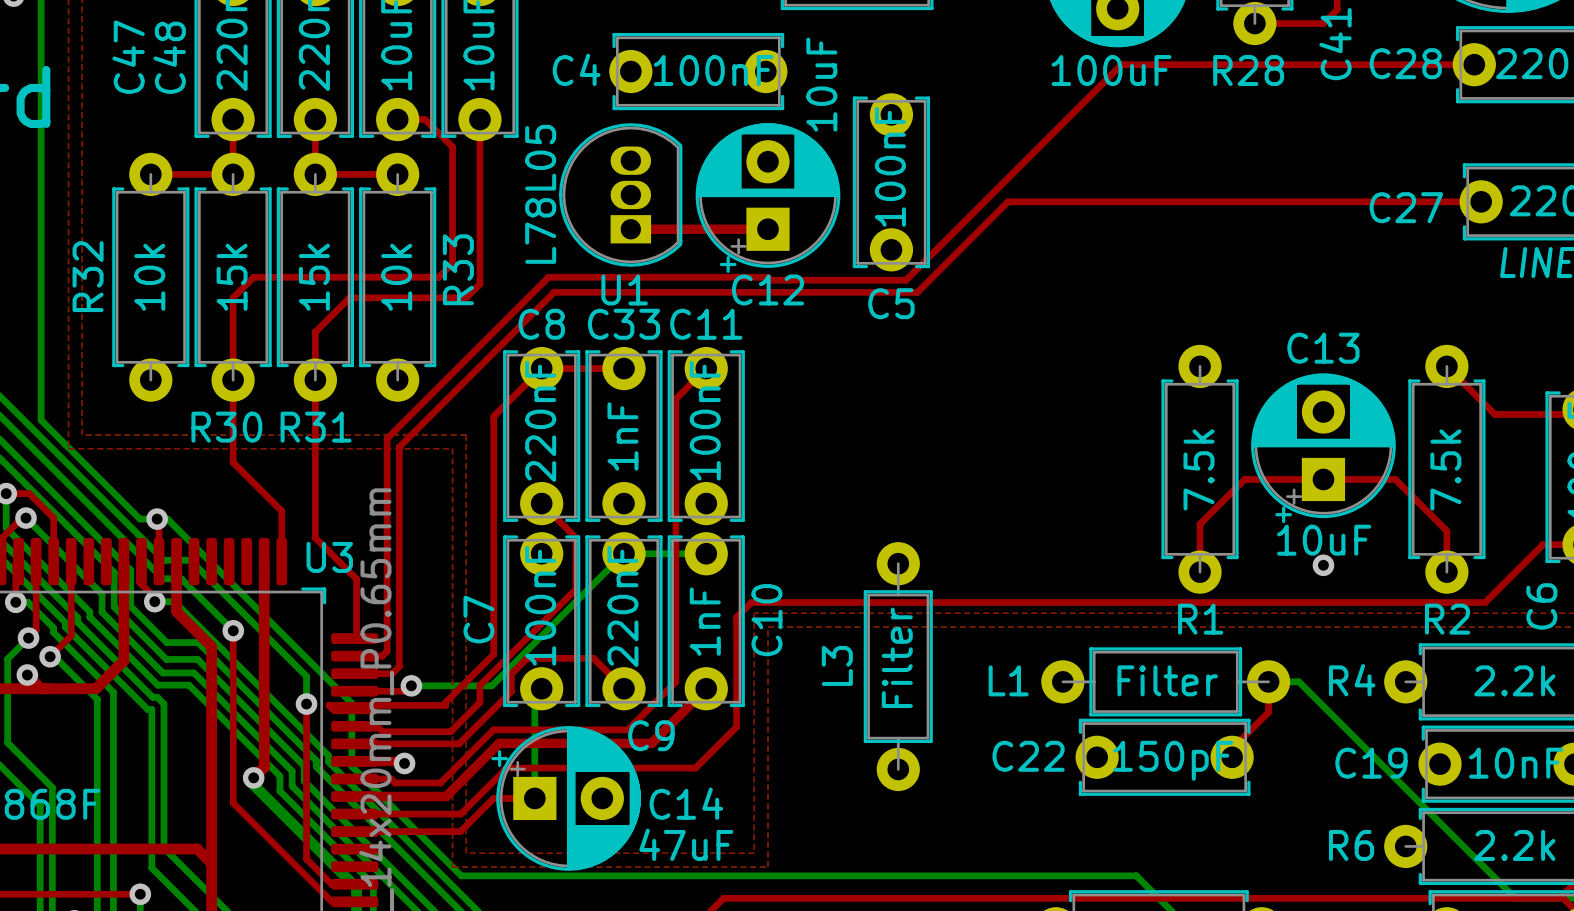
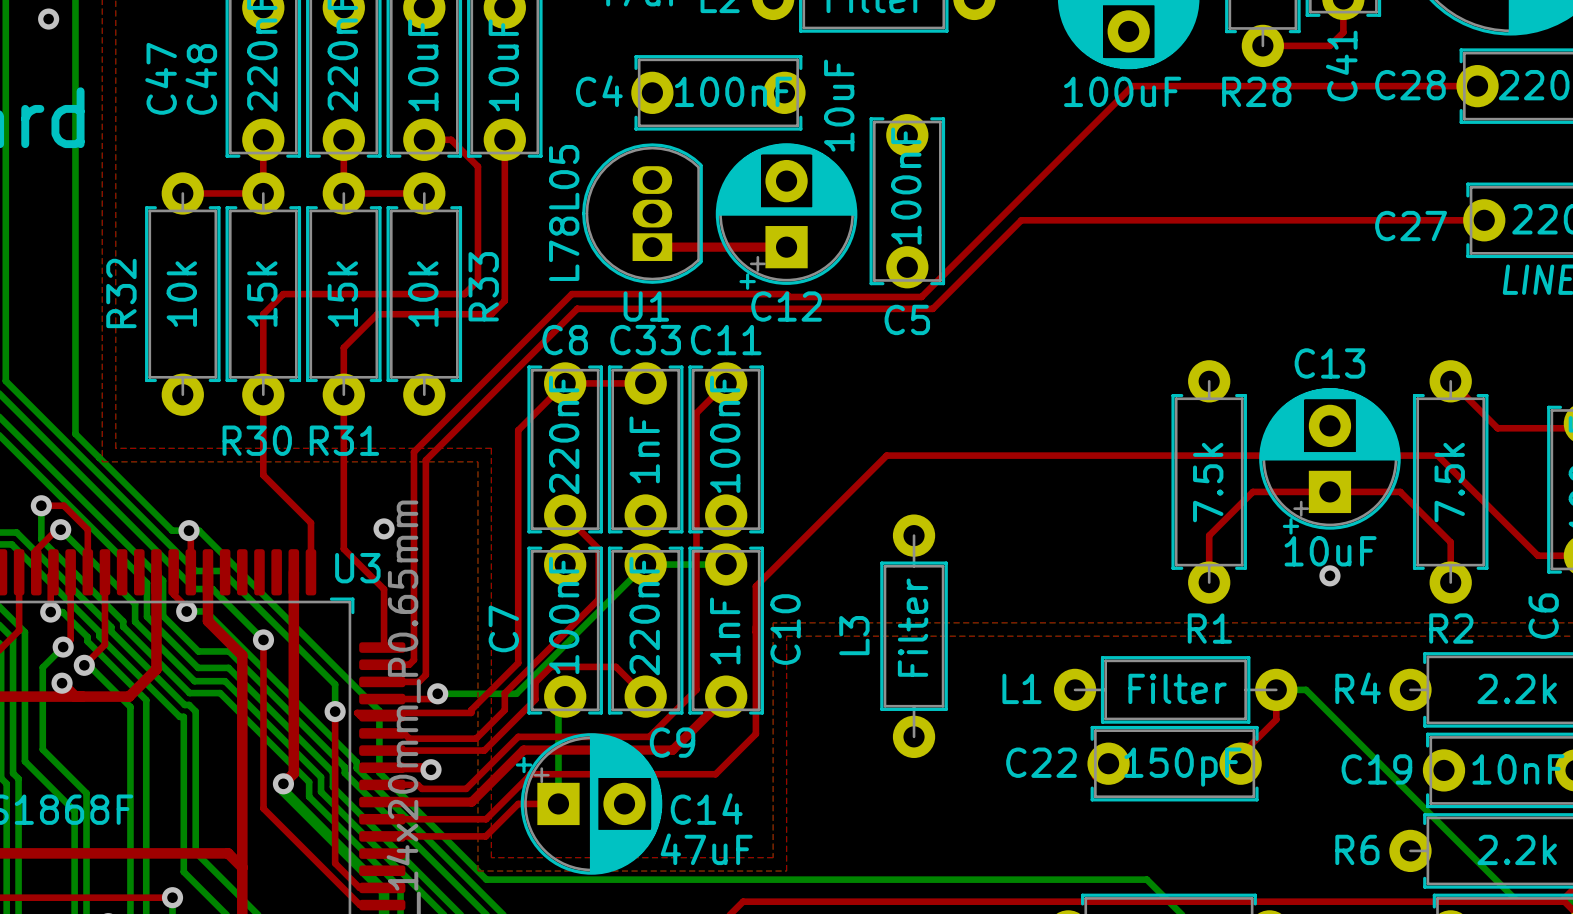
via: none -> (384, 528)
top track: (1542, 544) (1485, 602) (751, 602) (736, 617) -> (1544, 555) (1537, 555) (1437, 455) (886, 455) (755, 586) (755, 626)
L3 position: (898, 666) -> (914, 636)

